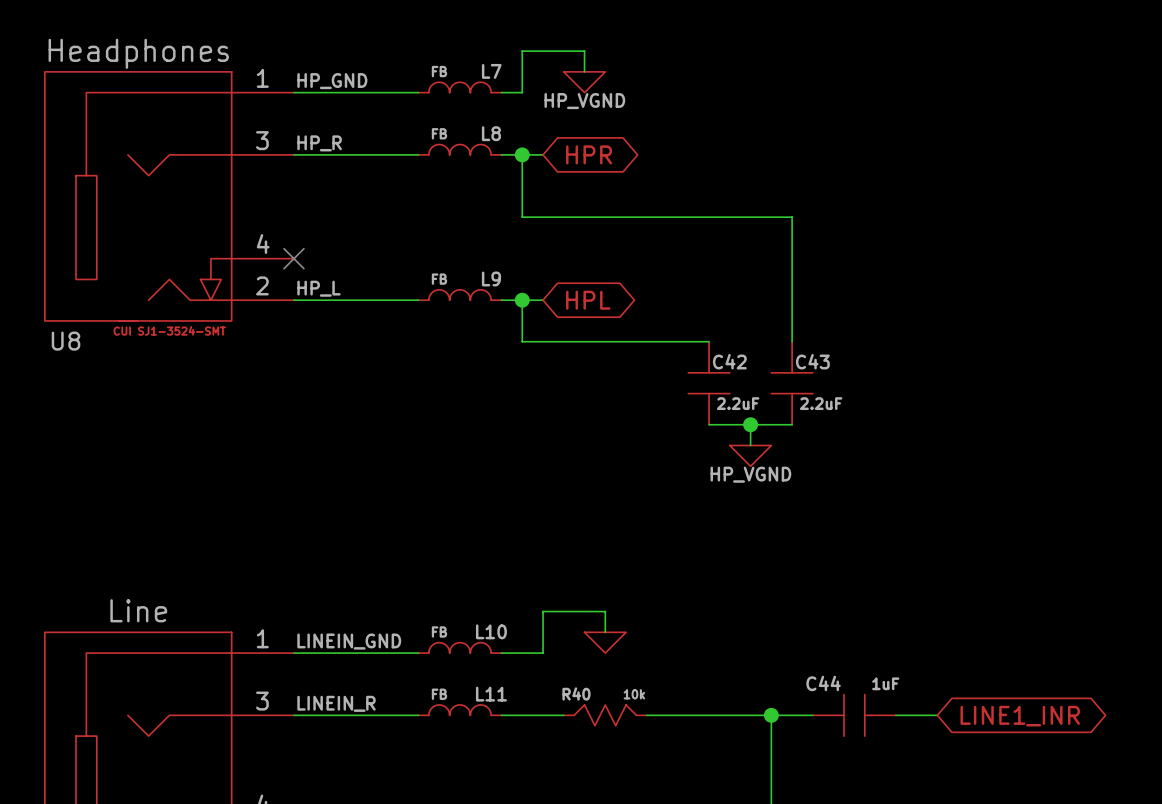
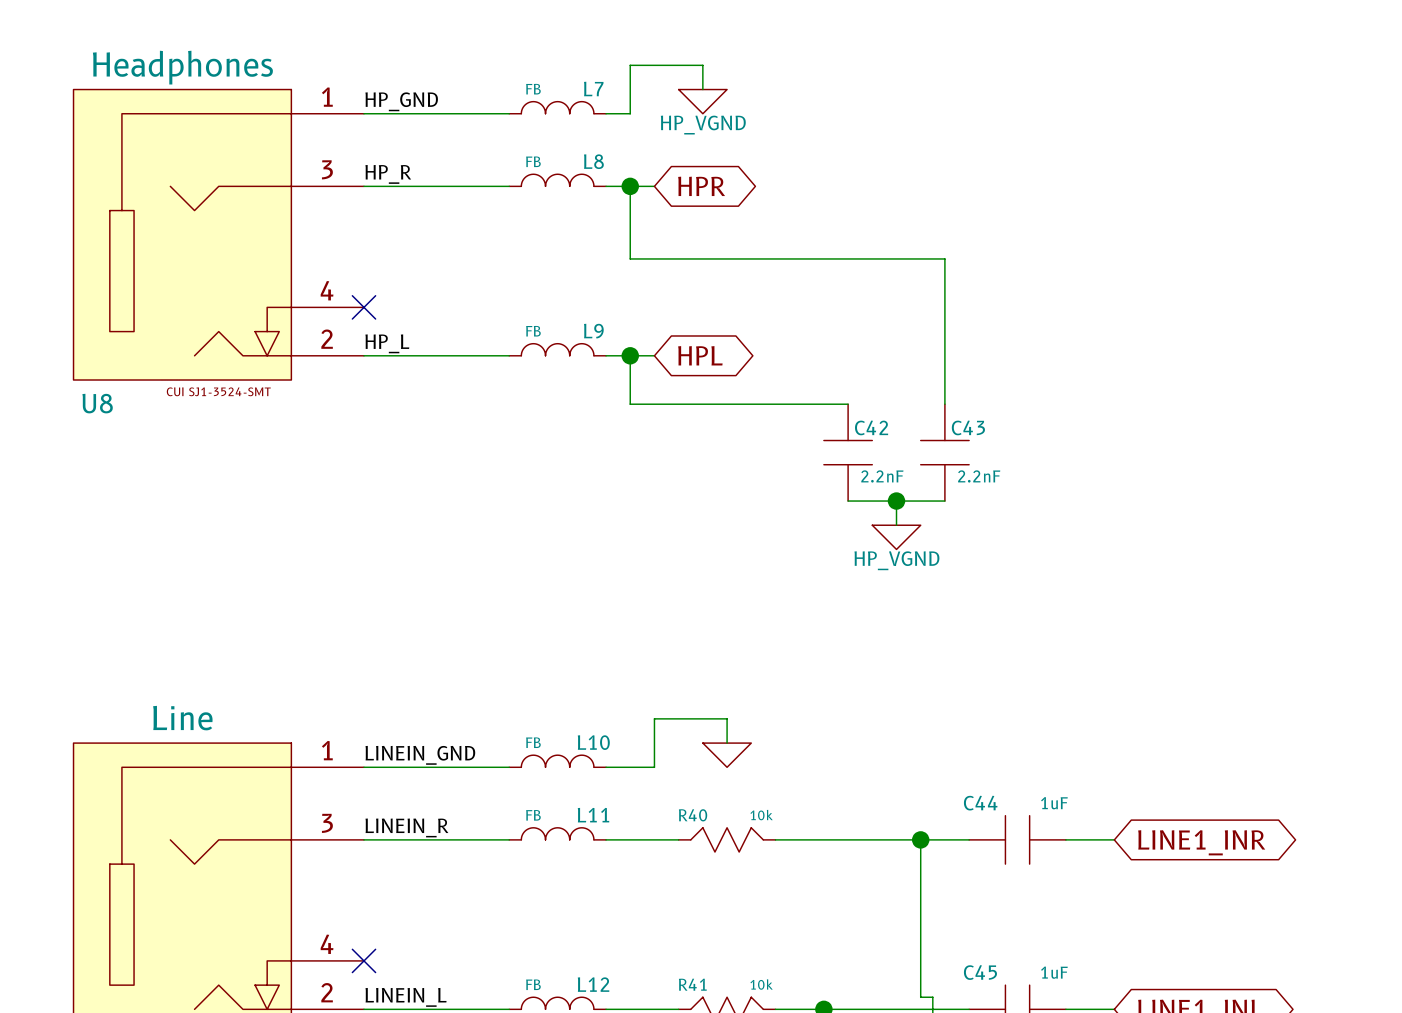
C42 value: 2.2uF (738, 403) -> 2.2nF (882, 476)
C43 value: 2.2uF (821, 403) -> 2.2nF (979, 476)

